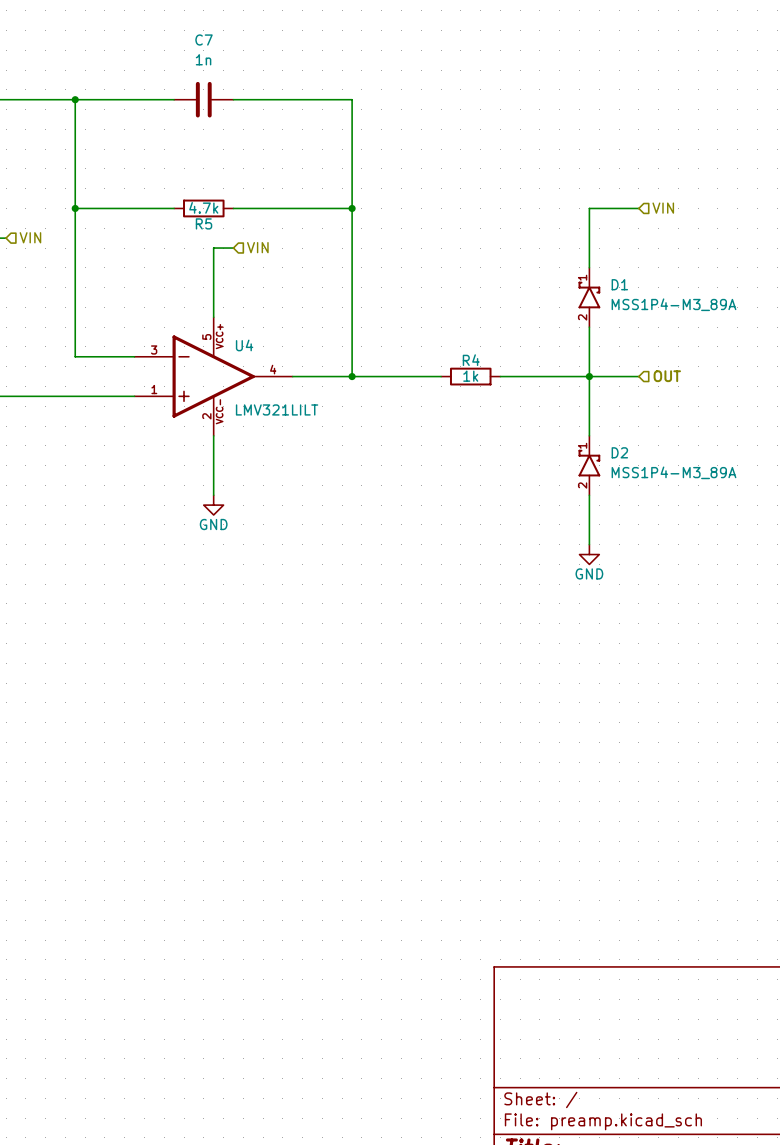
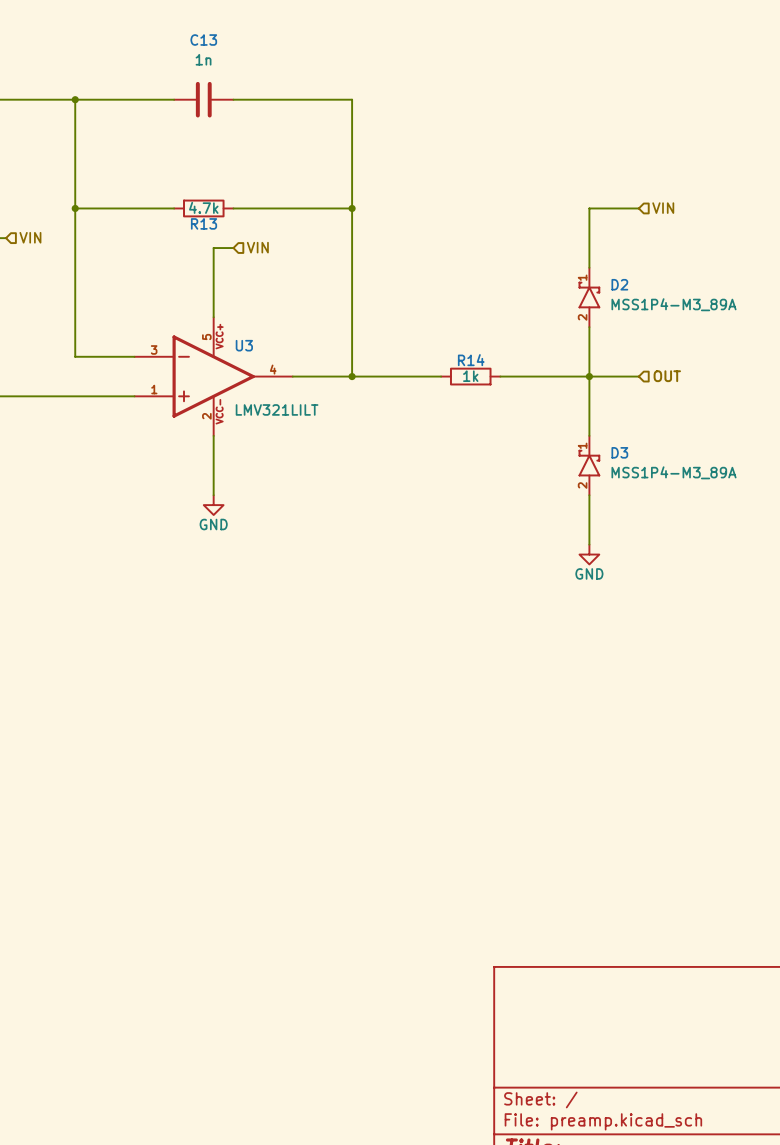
C7 name: C7 (204, 40) -> C13 (203, 40)
R5 name: R5 (204, 223) -> R13 (204, 223)
D1 name: D1 (619, 284) -> D2 (619, 284)
U4 name: U4 (244, 345) -> U3 (244, 345)
R4 name: R4 (471, 360) -> R14 (471, 360)
D2 name: D2 (619, 452) -> D3 (619, 452)

